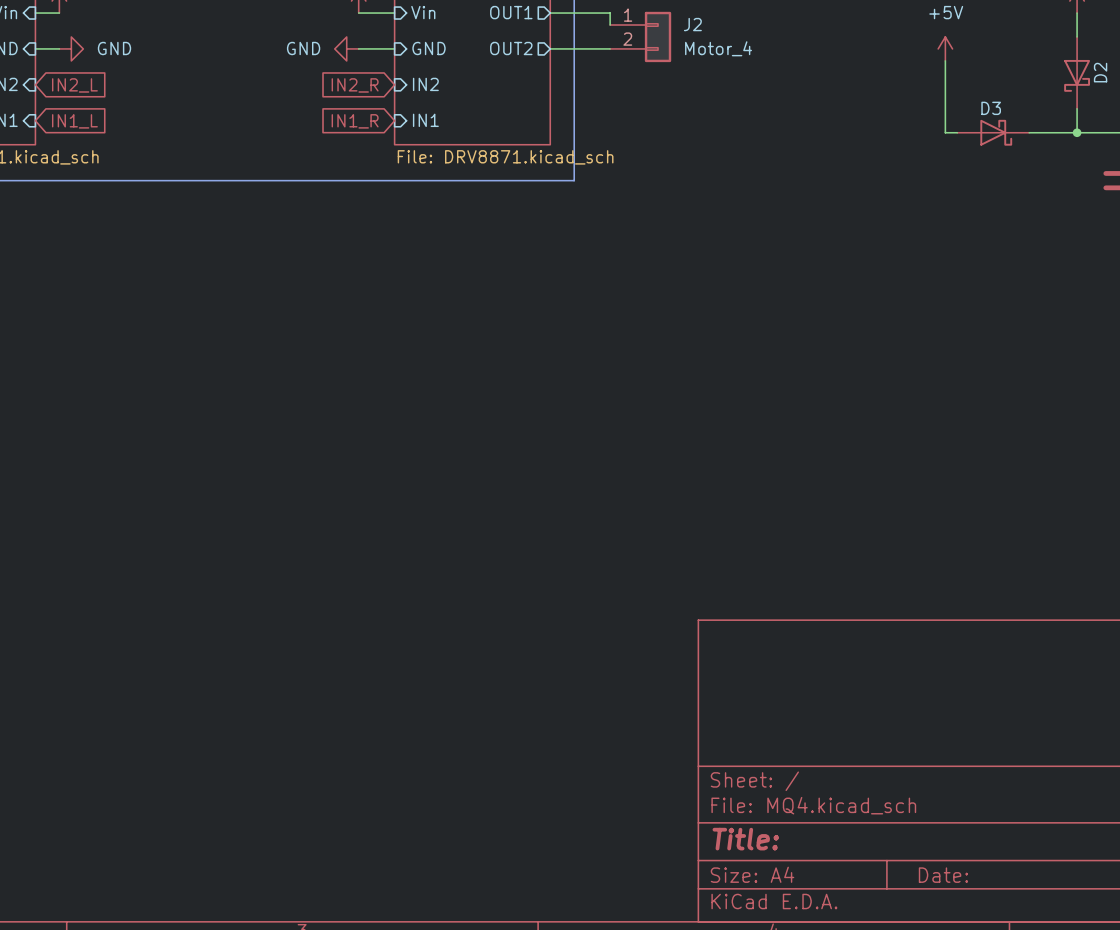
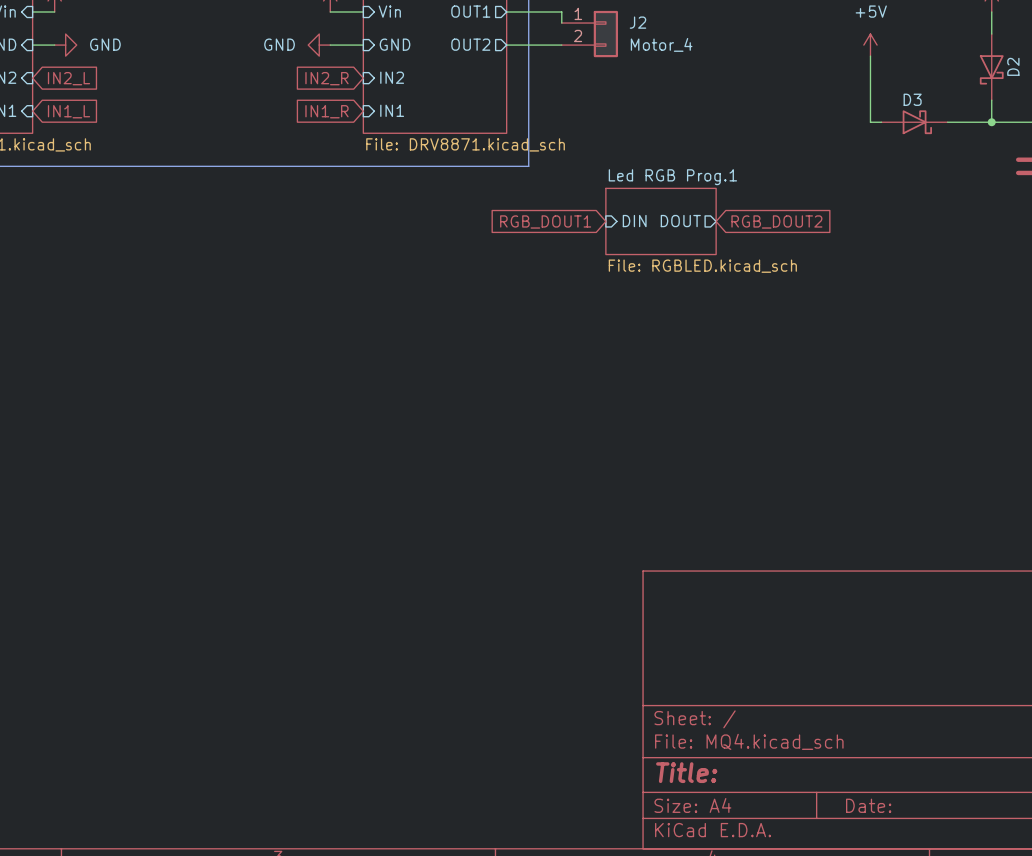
sheet pin: none -> DIN (634, 221)
sheet Led RGB Prog.1: none -> File: RGBLED.kicad_sch (661, 221)
sheet pin: none -> DOUT (680, 221)
global label: none -> RGB_DOUT1 (545, 221)
global label: none -> RGB_DOUT2 (776, 221)

